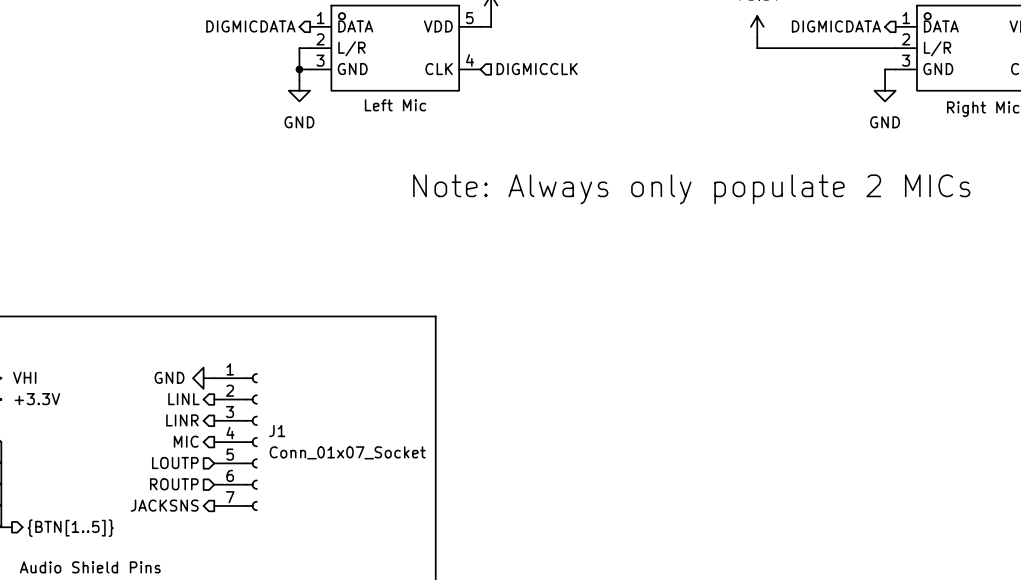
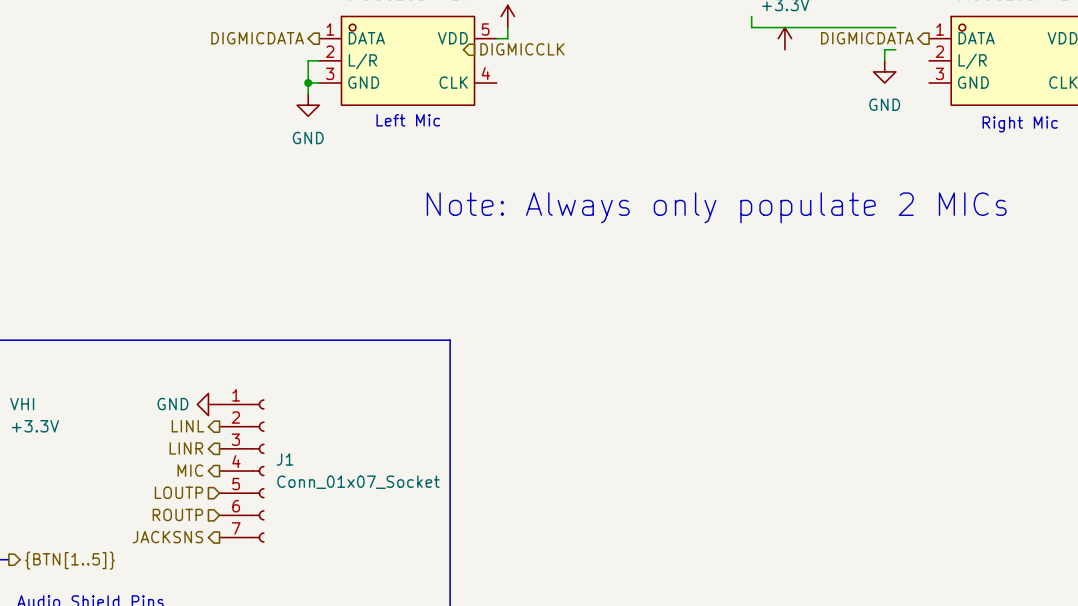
wire: (757, 37) (757, 48) (895, 48) -> (751, 16) (751, 27) (895, 27)
hierarchical label position: DIGMICCLK (537, 69) -> DIGMICCLK (522, 49)
wire: (895, 69) (885, 69) (885, 80) -> (895, 49) (884, 49) (884, 60)
power symbol position: GND (885, 90) -> GND (884, 71)

